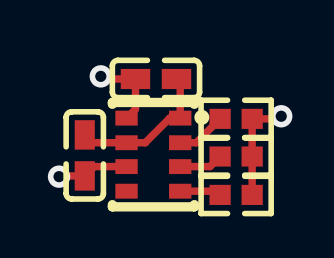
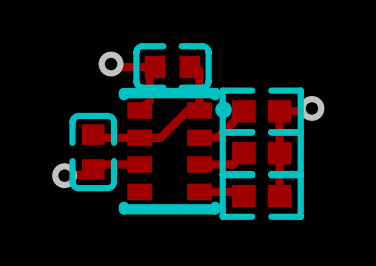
part footprint: [109, 57, 203, 101] -> [133, 43, 212, 91]
part footprint: [63, 108, 107, 202] -> [69, 112, 118, 192]

